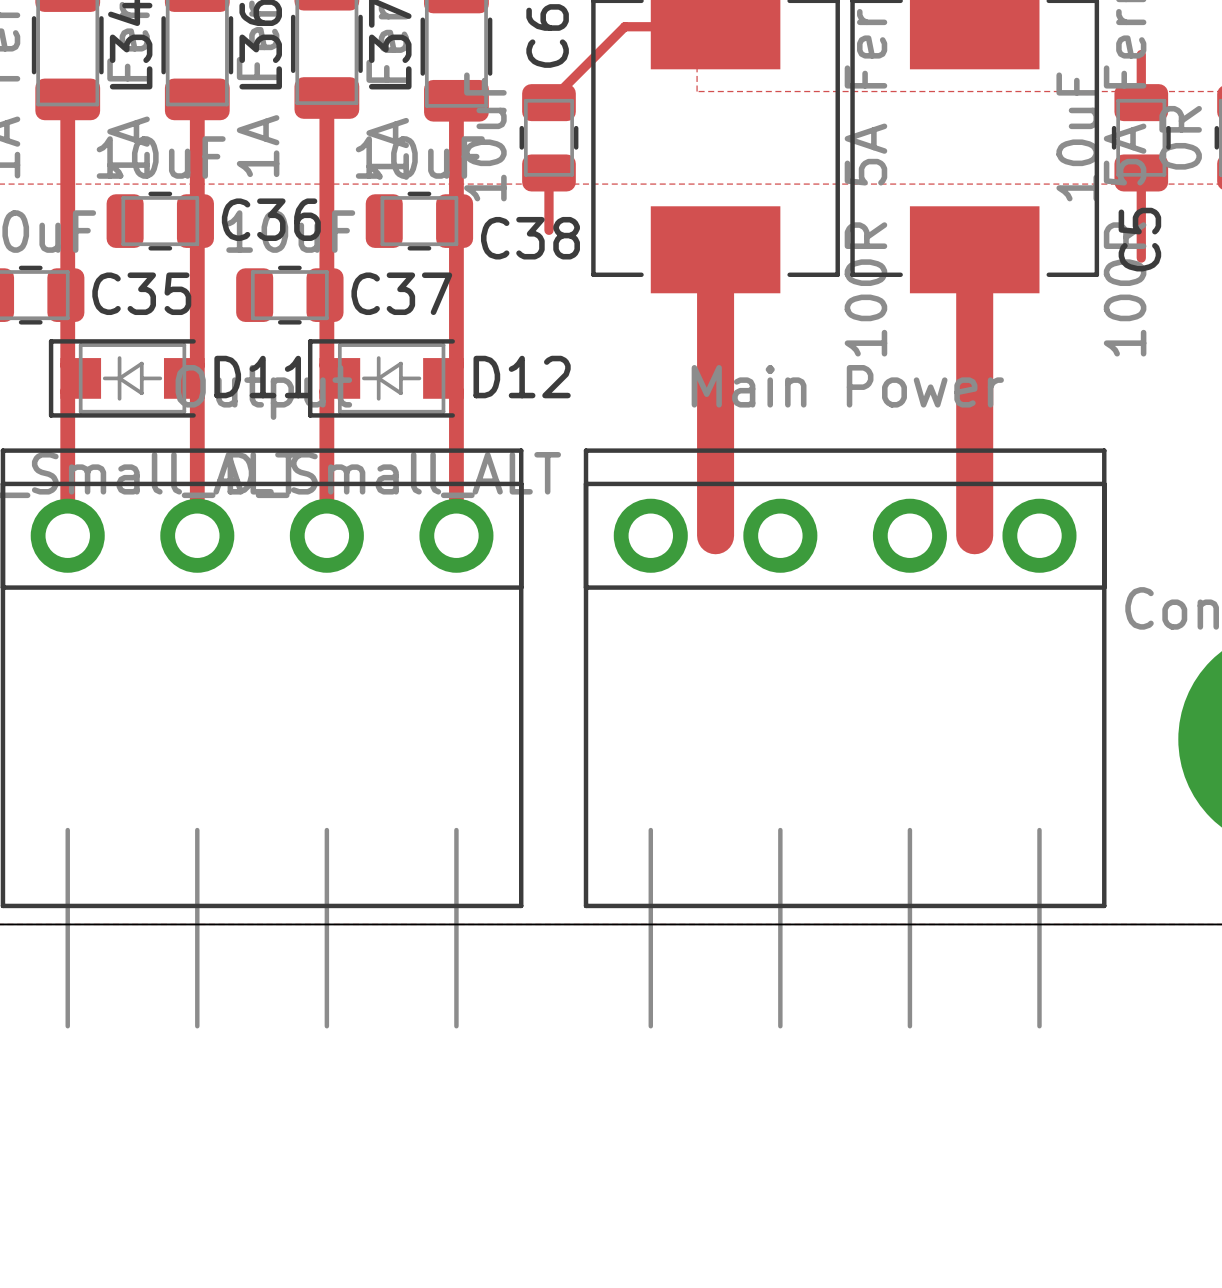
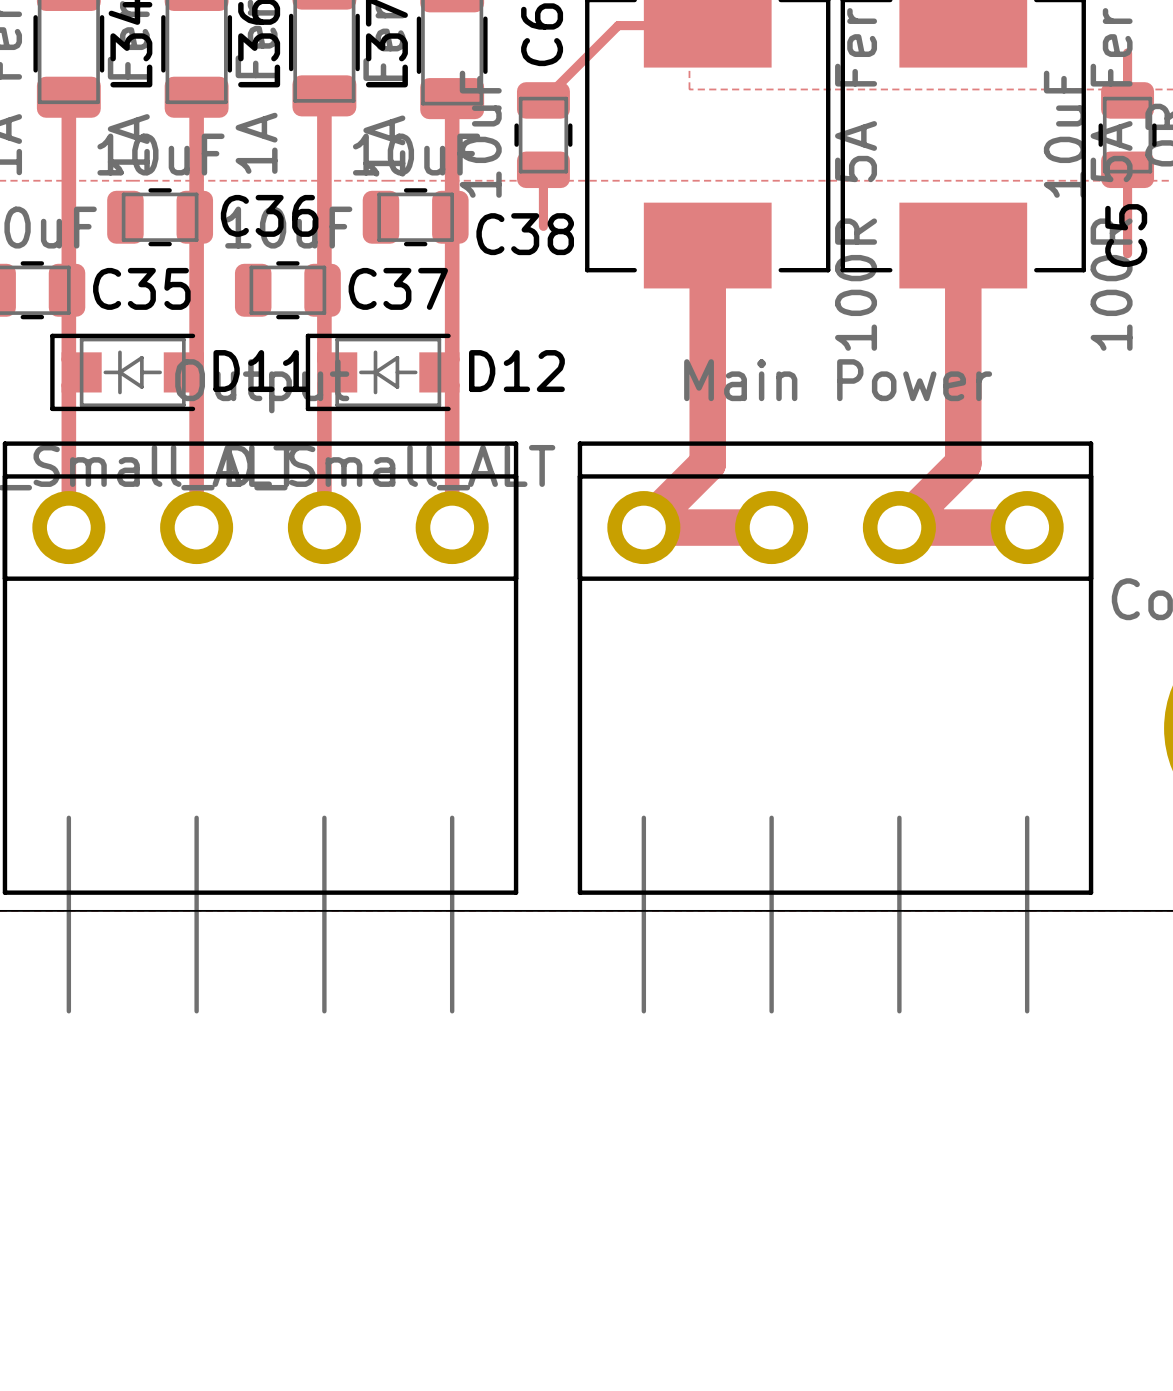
track: (715, 470) (715, 535) -> (707, 463) (643, 527) (771, 527)
track: (974, 470) (974, 535) -> (963, 463) (899, 527) (1027, 527)

